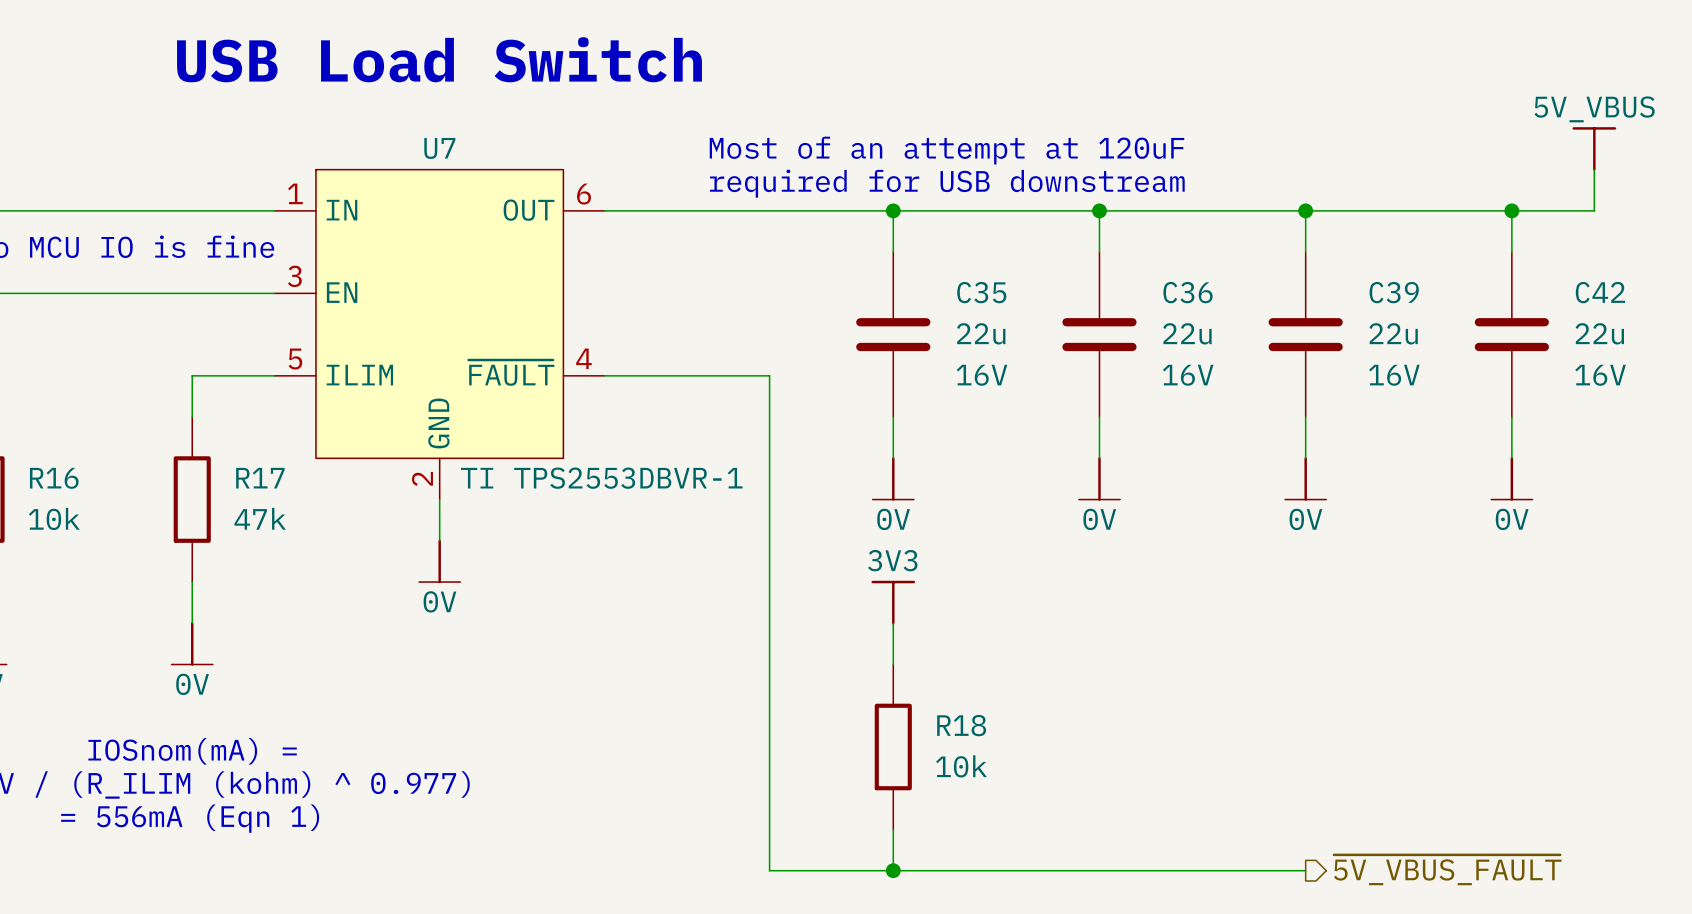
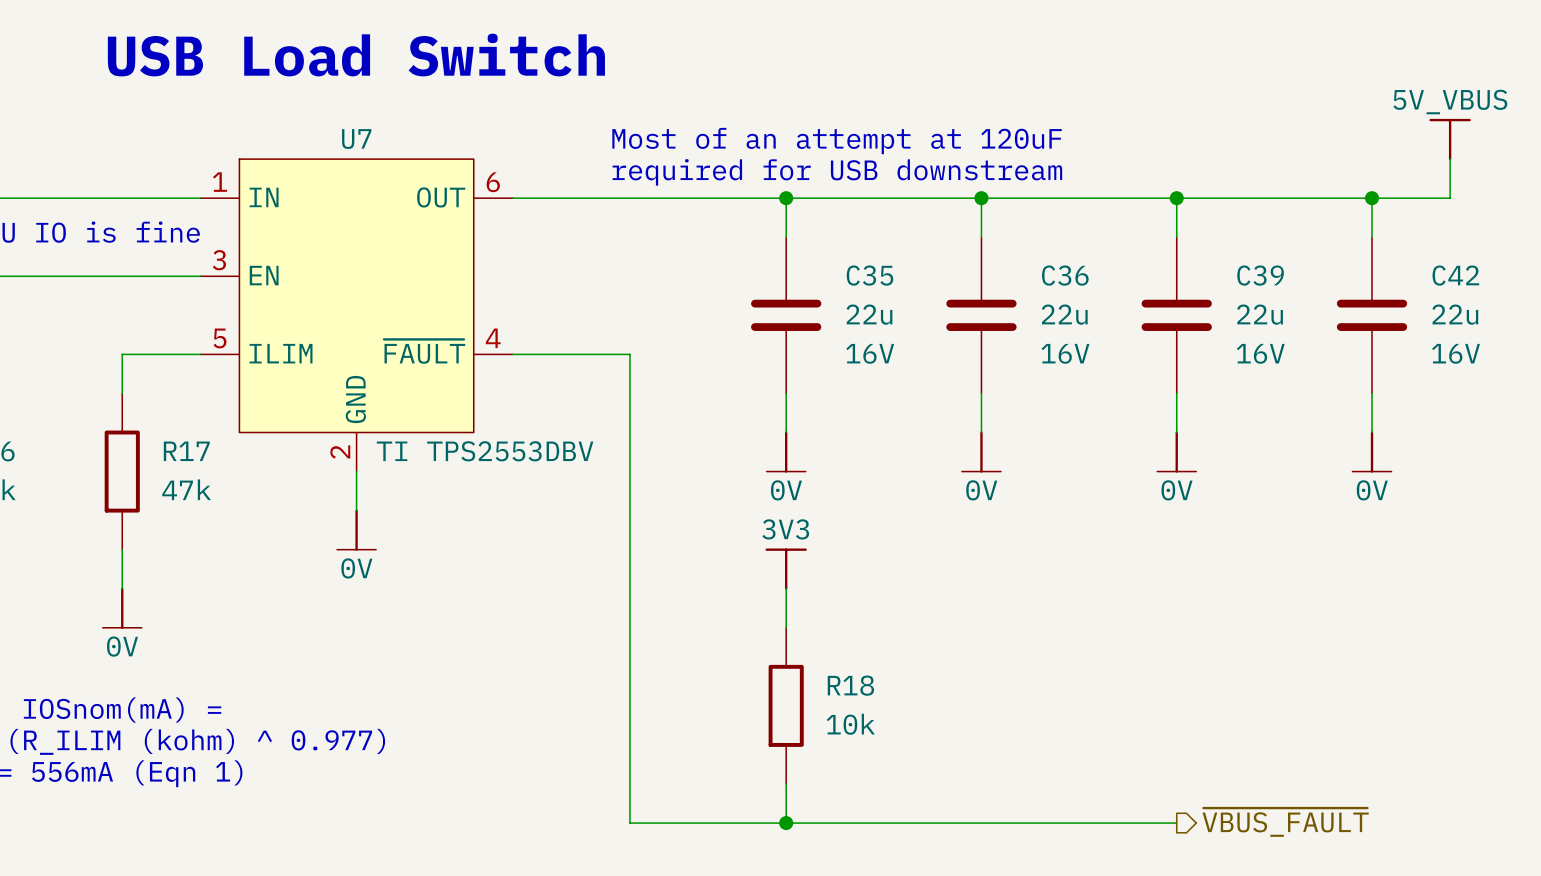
wire: (728, 375) (769, 375) (769, 870) -> (629, 354) (629, 823) (669, 823)
U7 value: TI TPS2553DBVR-1 (601, 478) -> TI TPS2553DBV (485, 451)
hierarchical label: ~{5V_VBUS_FAULT} (1447, 870) -> ~{VBUS_FAULT} (1285, 822)

